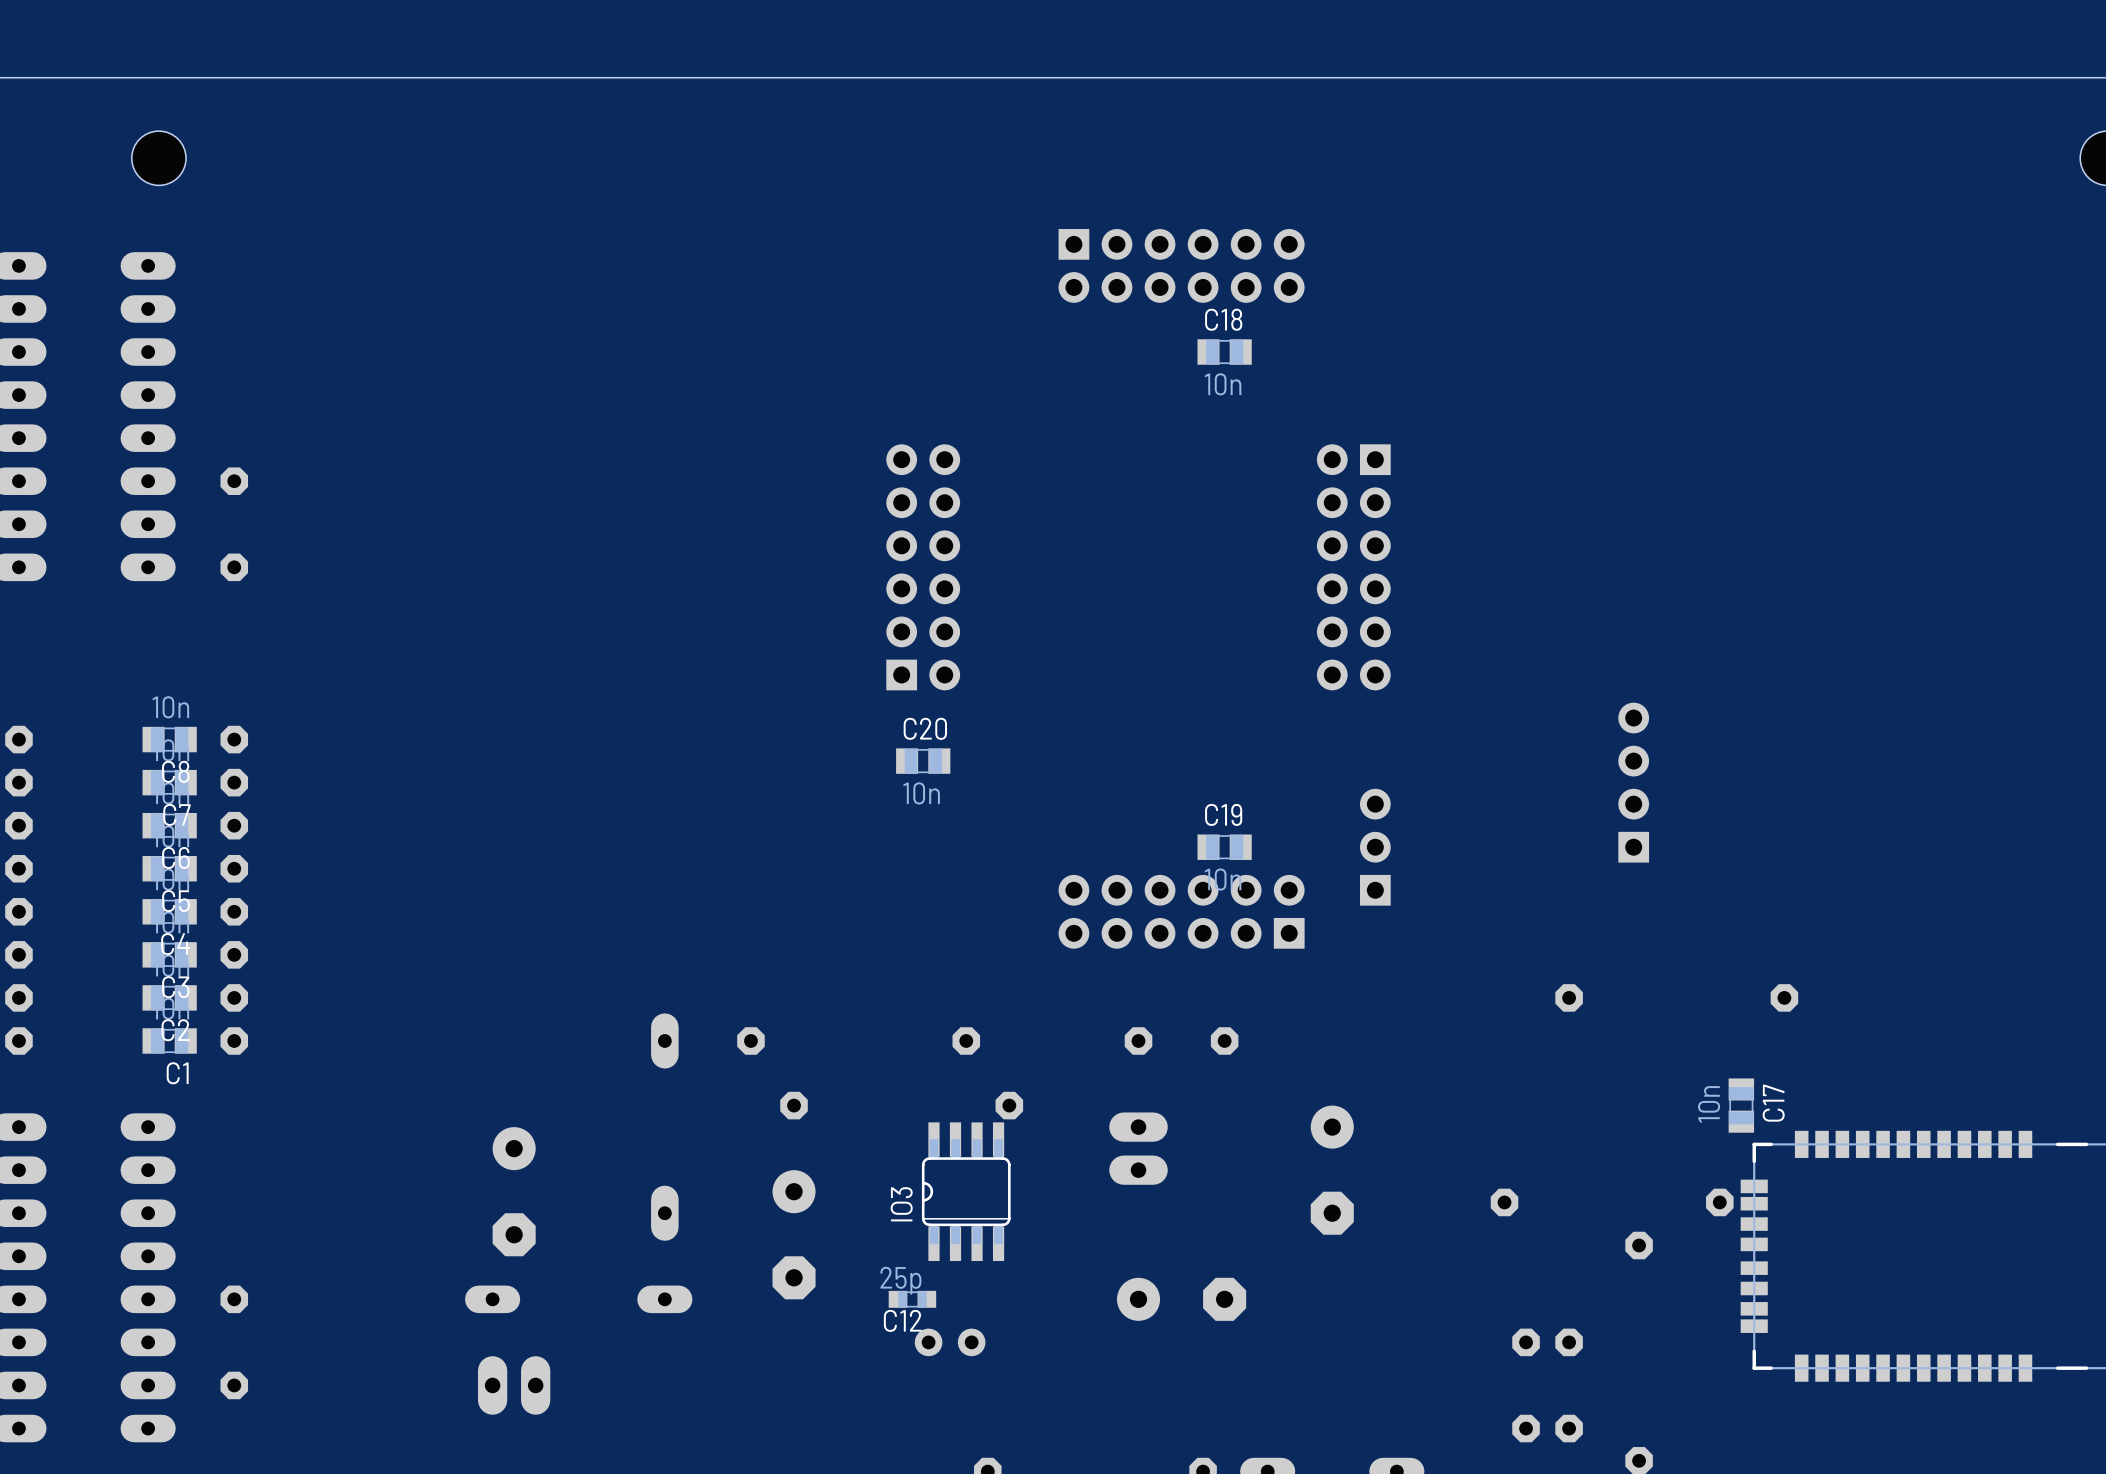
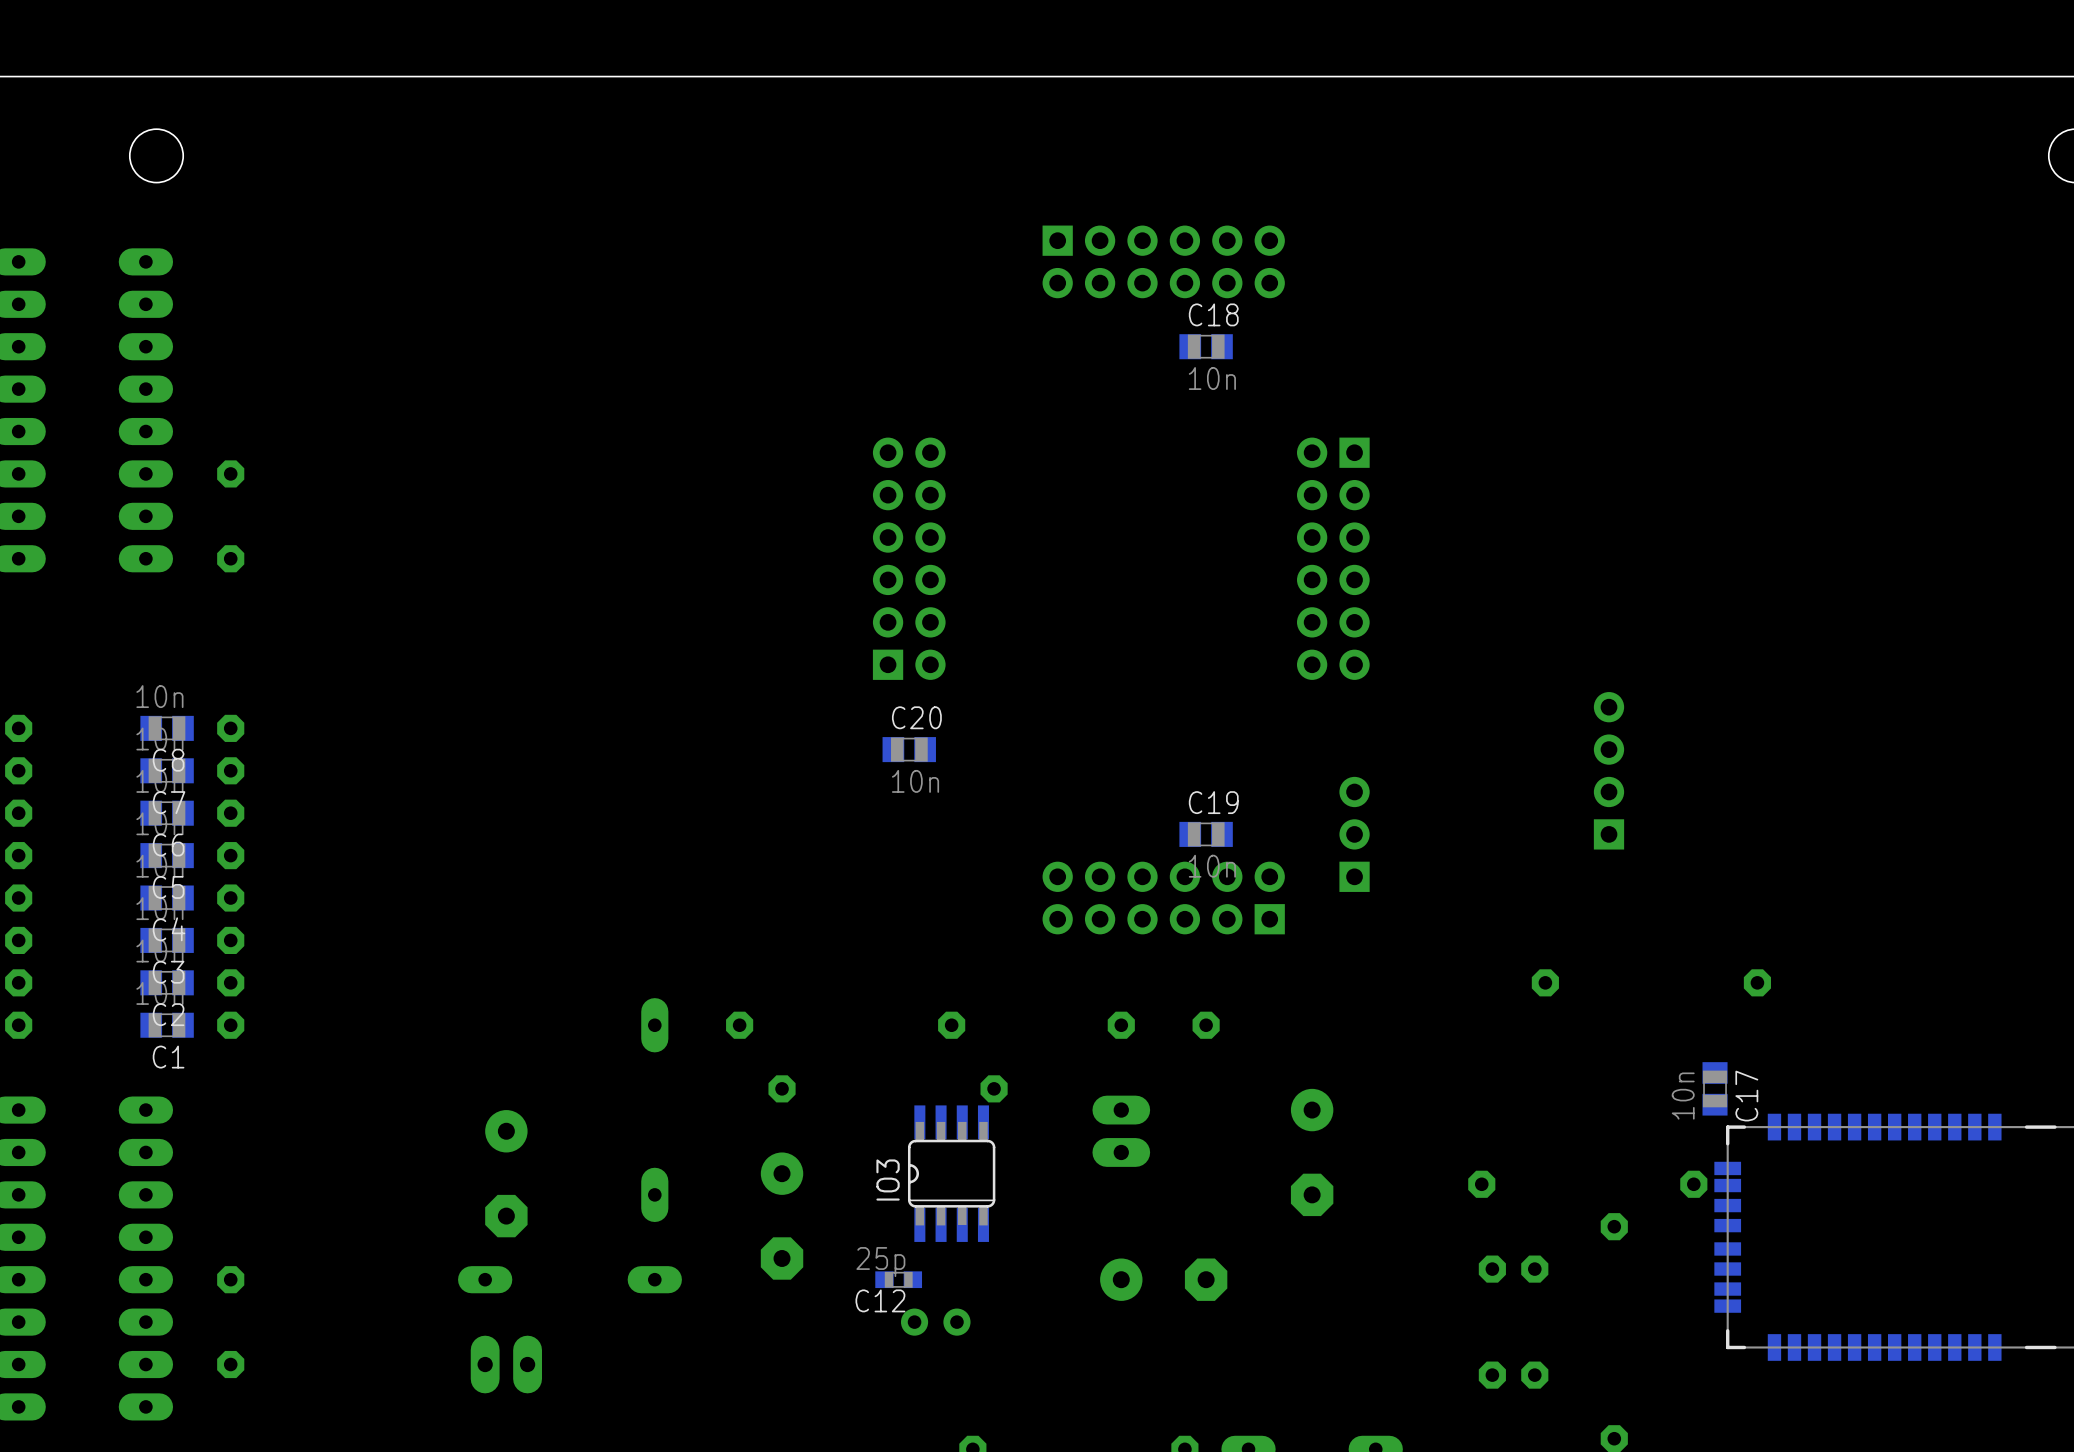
part: none -> (1513, 1269)
part: (1547, 1342) -> none
part: none -> (1513, 1375)
part: (1547, 1428) -> none

